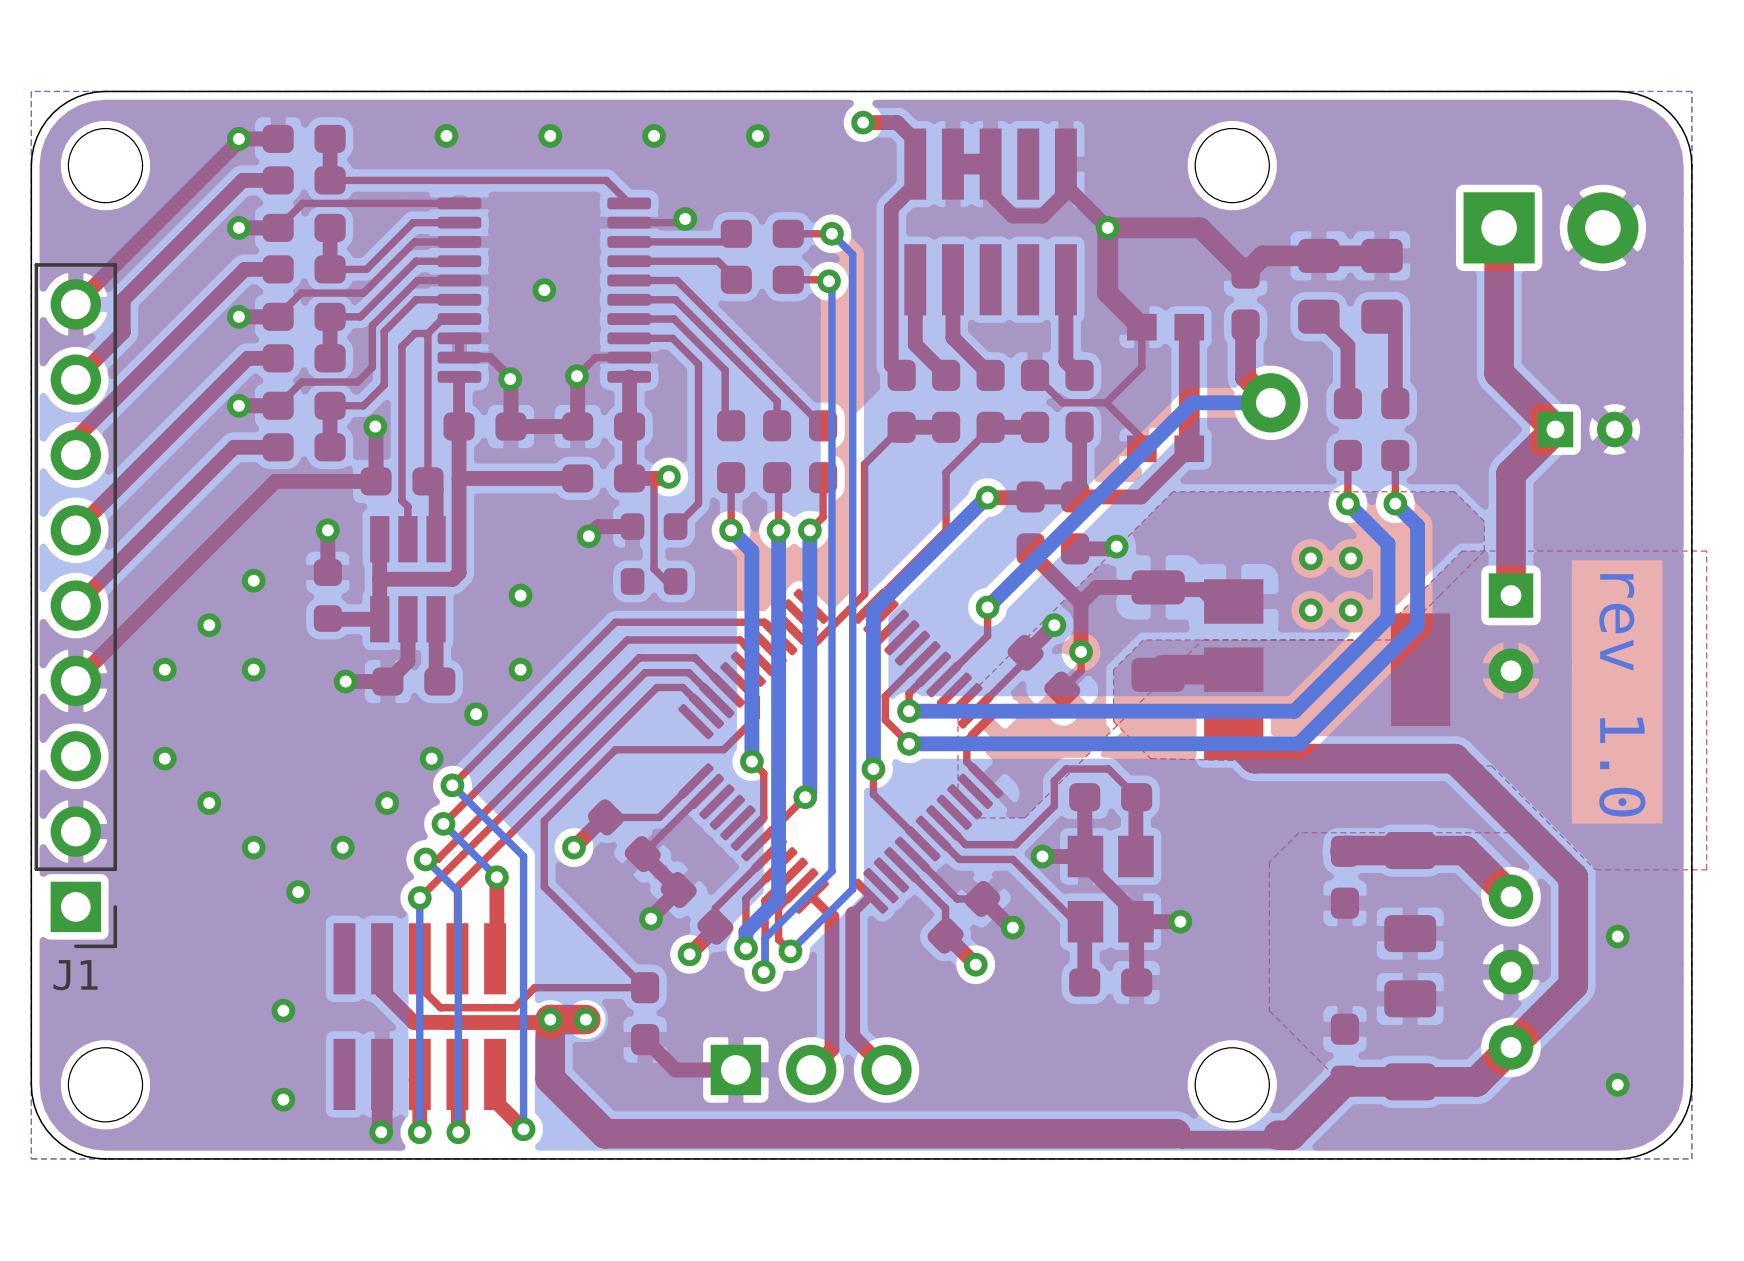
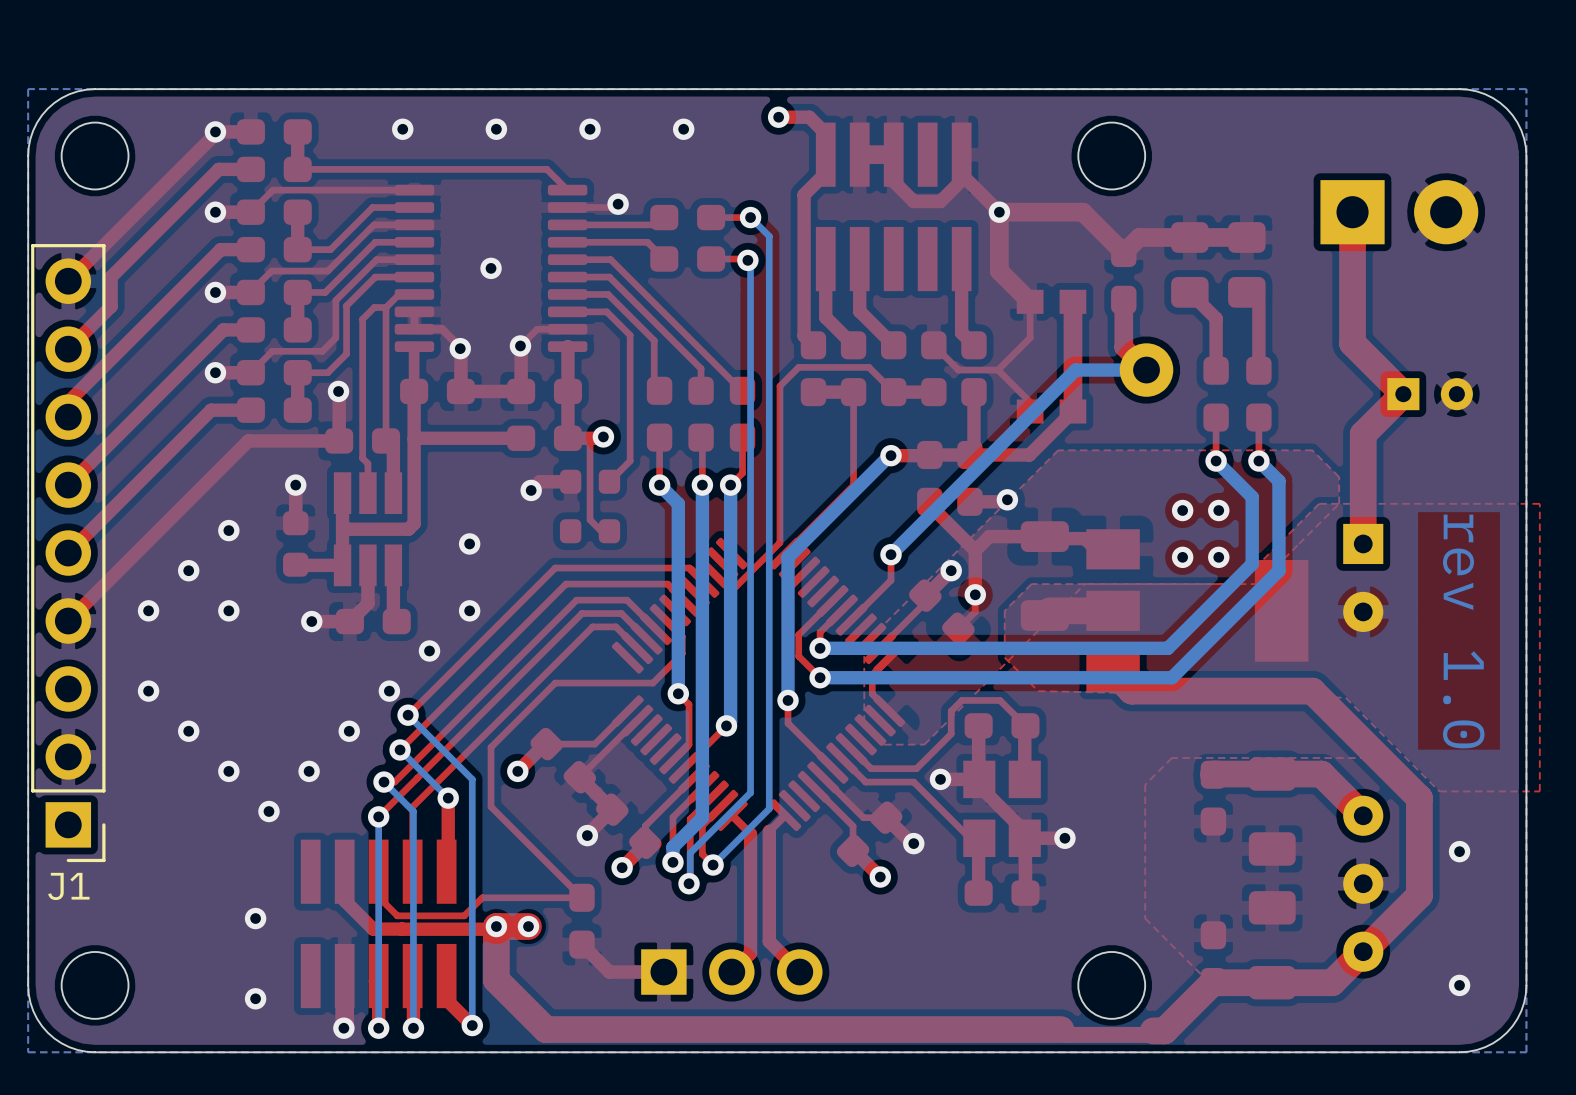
top track: (901, 427) (864, 464) -> (893, 392) (868, 367) (798, 367) (779, 386) (779, 425)
top track: (990, 427) (946, 472) -> (853, 392) (853, 432)

